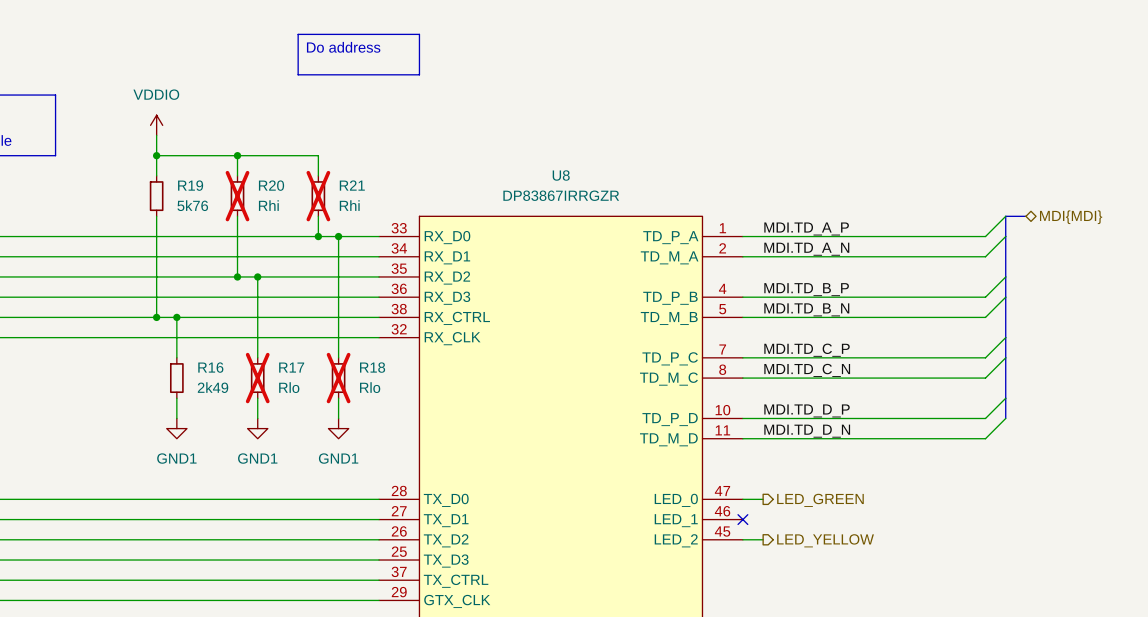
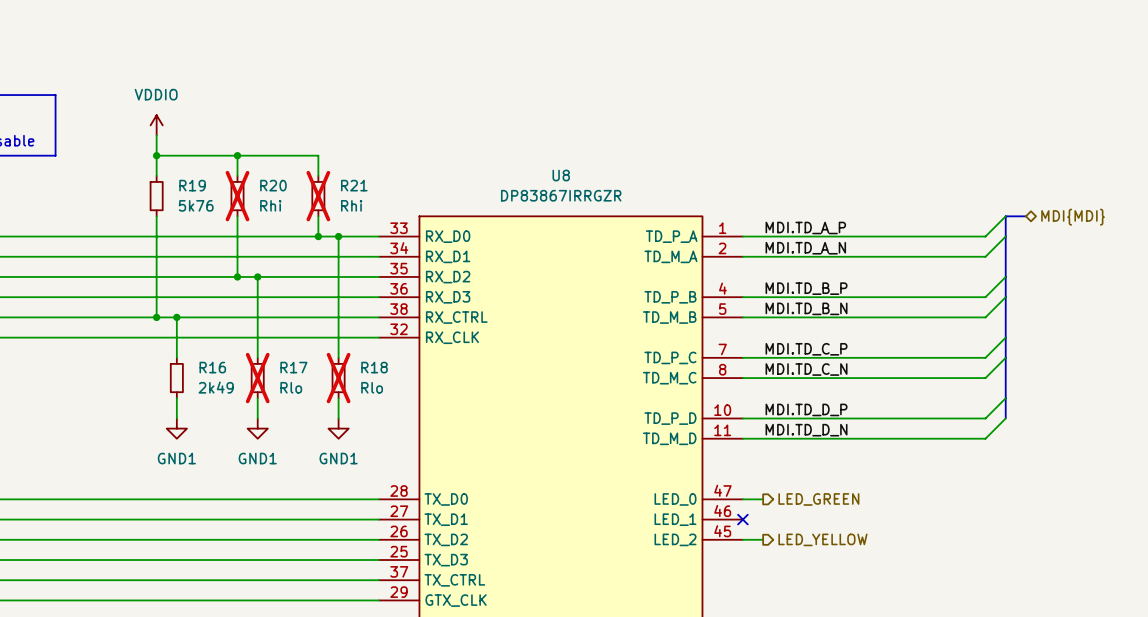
line: (298, 34) (419, 34) (419, 74) (298, 74) (298, 34) -> none
text: Do address (343, 47) -> none

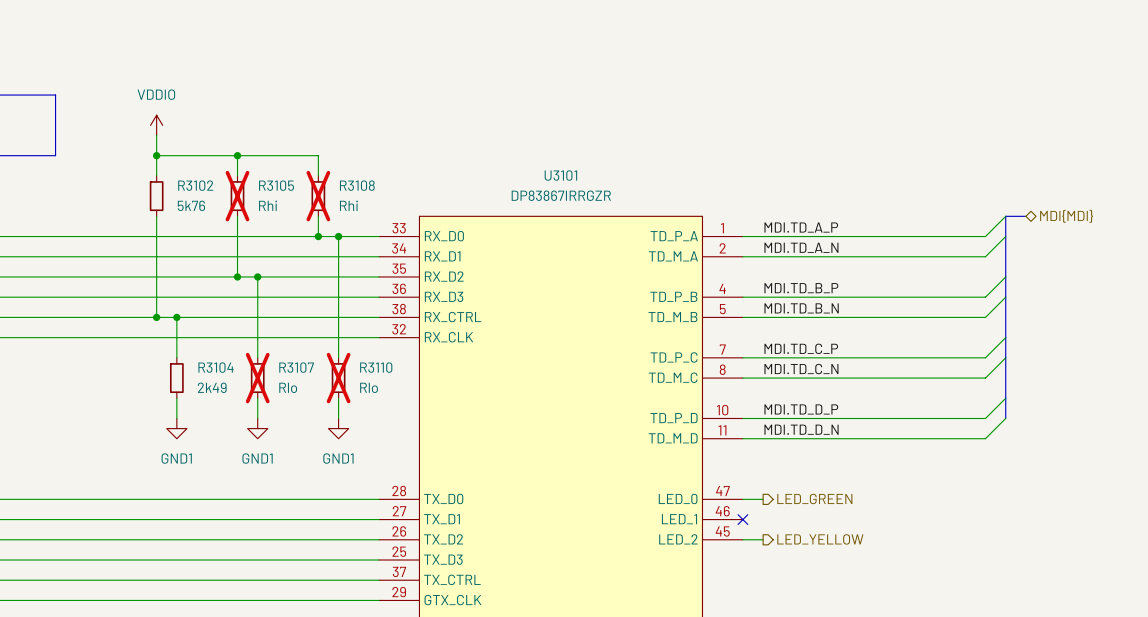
U8 name: U8 (561, 175) -> U3101 (560, 175)
R19 name: R19 (192, 185) -> R3102 (195, 185)
R20 name: R20 (273, 185) -> R3105 (276, 185)
R21 name: R21 (354, 185) -> R3108 (357, 185)
R16 name: R16 (212, 367) -> R3104 (216, 367)
R17 name: R17 (293, 367) -> R3107 (296, 367)
R18 name: R18 (374, 367) -> R3110 (376, 367)

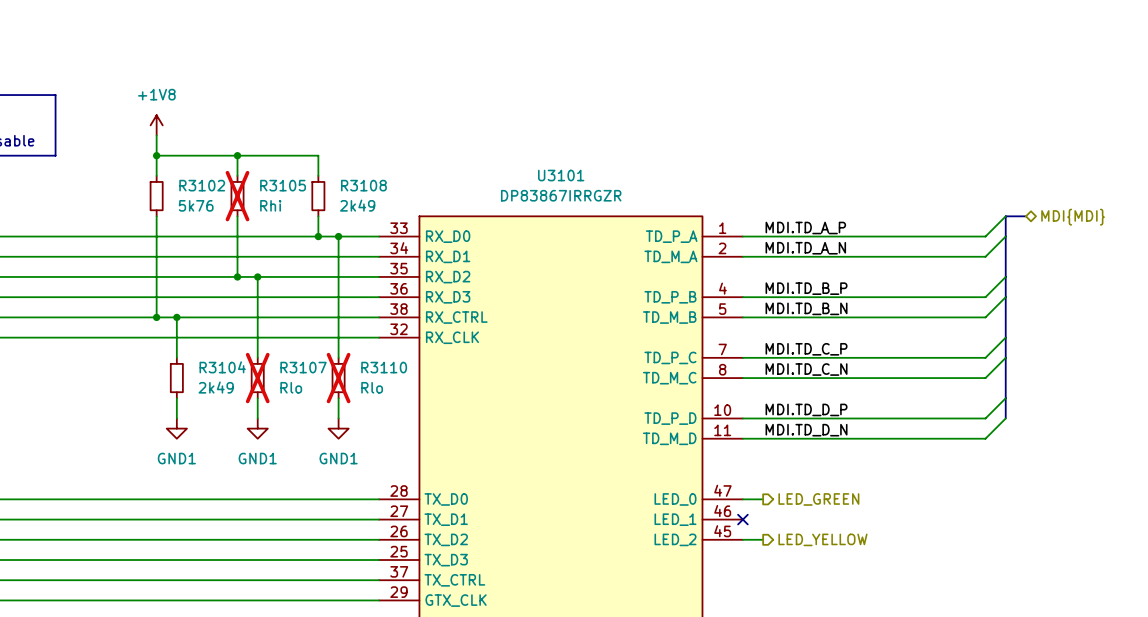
power symbol: VDDIO (156, 125) -> +1V8 (156, 125)
R3108 do-not-place cross: (318, 196) -> none
R3108 value: Rhi (348, 205) -> 2k49 (357, 205)

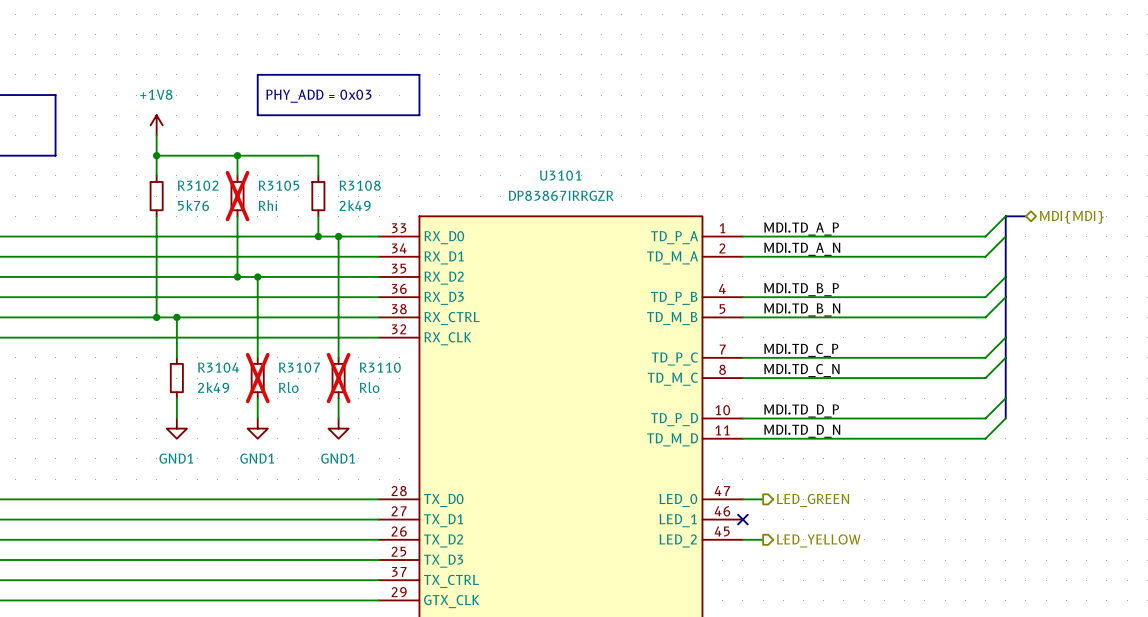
line: none -> (257, 74) (419, 74) (419, 115) (257, 115) (257, 74)
text: none -> PHY_ADD = 0x03 (318, 96)

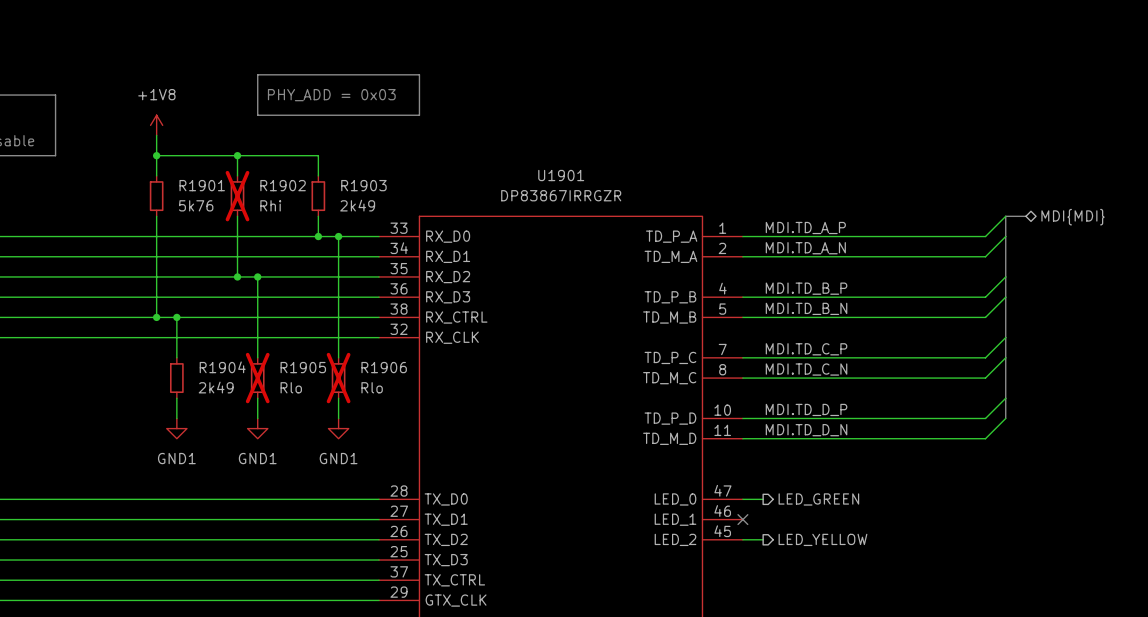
U3101 name: U3101 (560, 175) -> U1901 (561, 175)
R3102 name: R3102 (198, 185) -> R1901 (202, 185)
R3105 name: R3105 (279, 185) -> R1902 (283, 185)
R3108 name: R3108 (360, 185) -> R1903 (363, 185)
R3104 name: R3104 (218, 367) -> R1904 (222, 367)
R3107 name: R3107 (299, 367) -> R1905 (303, 367)
R3110 name: R3110 (380, 367) -> R1906 (384, 367)

